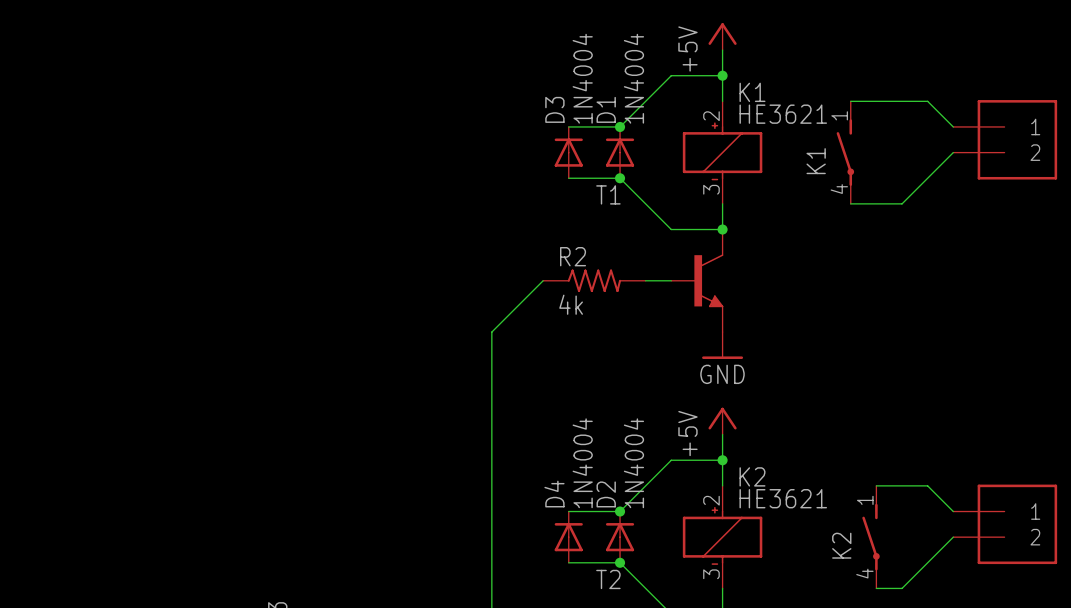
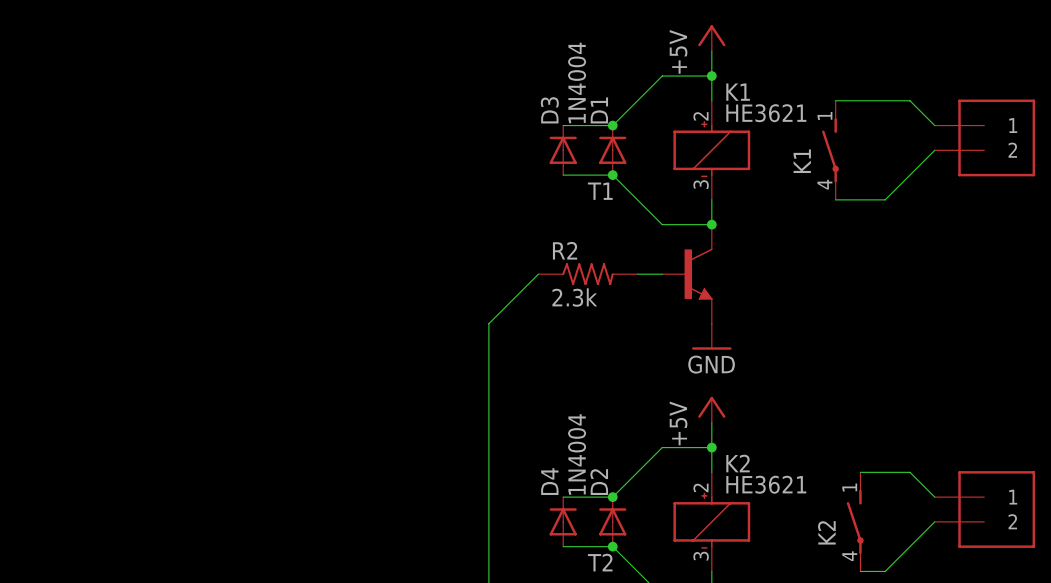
D1 value: 1N4004 (633, 78) -> none
R2 value: 4k (571, 304) -> 2.3k (574, 297)
D2 value: 1N4004 (633, 463) -> none

